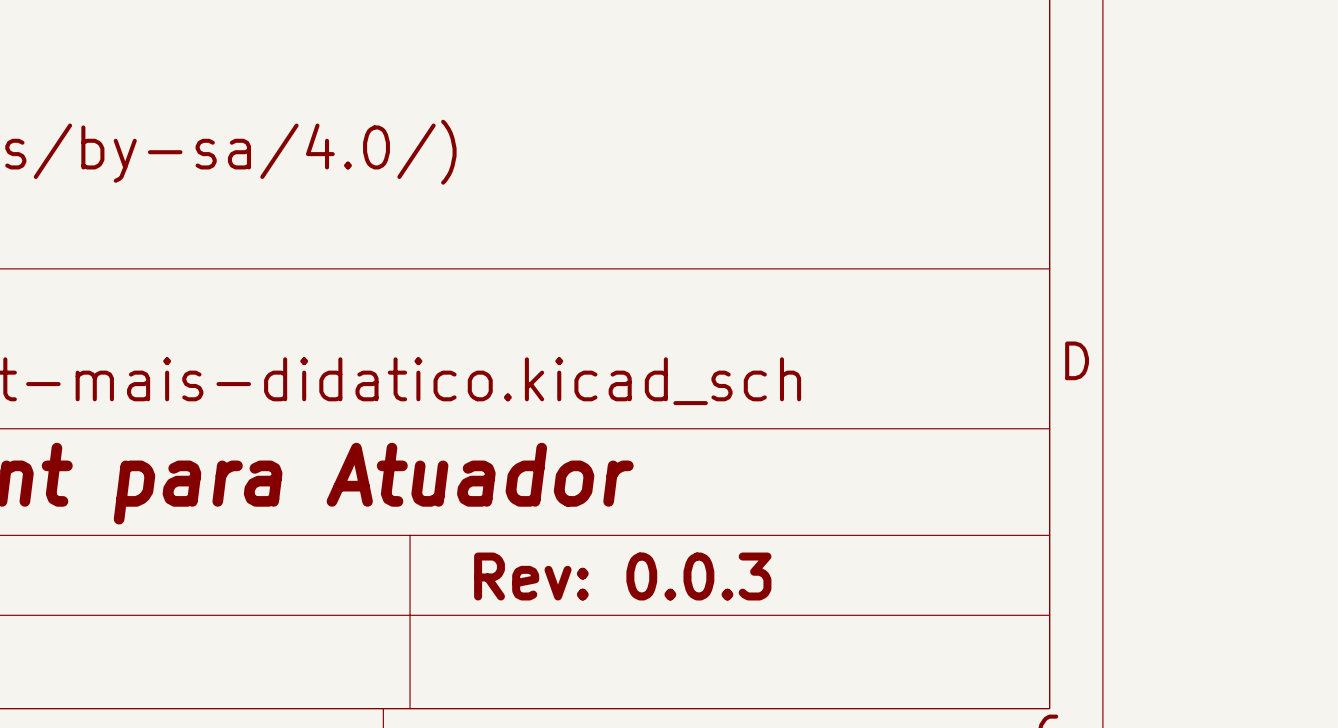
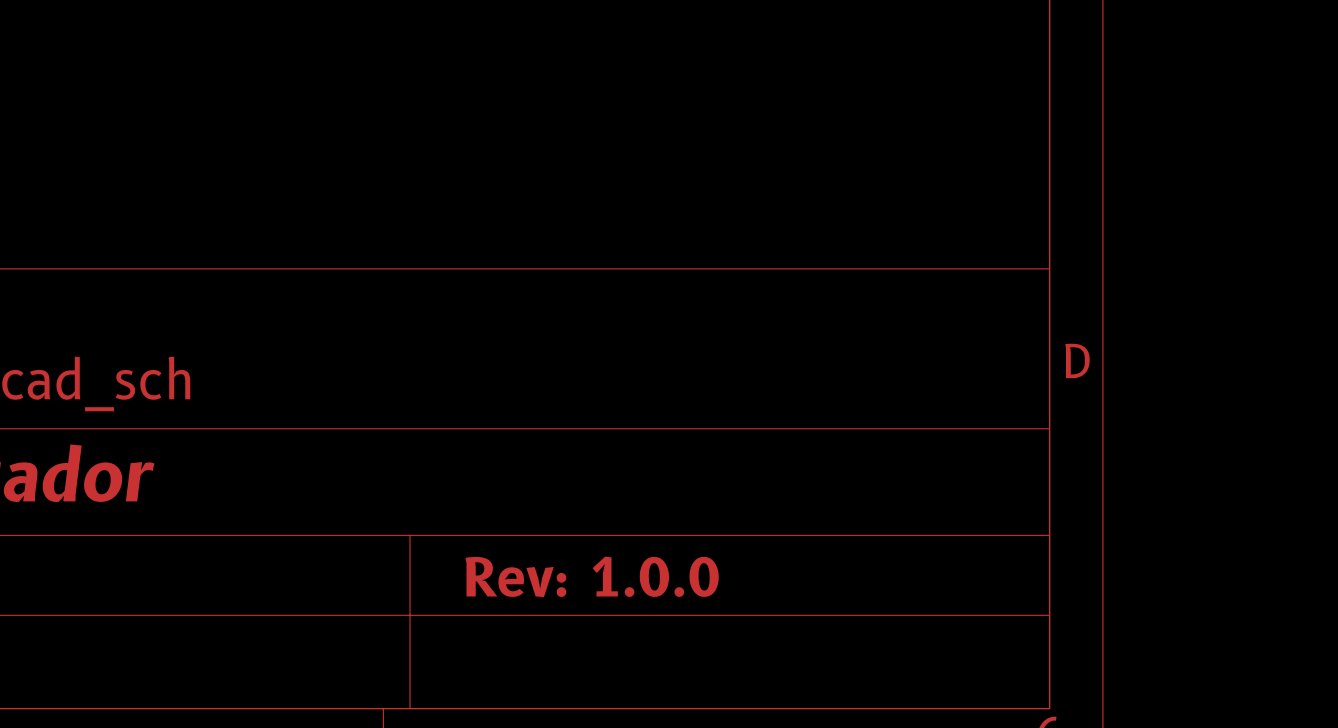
title block: Rev: 0.0.3 (622, 576) -> Rev: 1.0.0 (592, 576)

